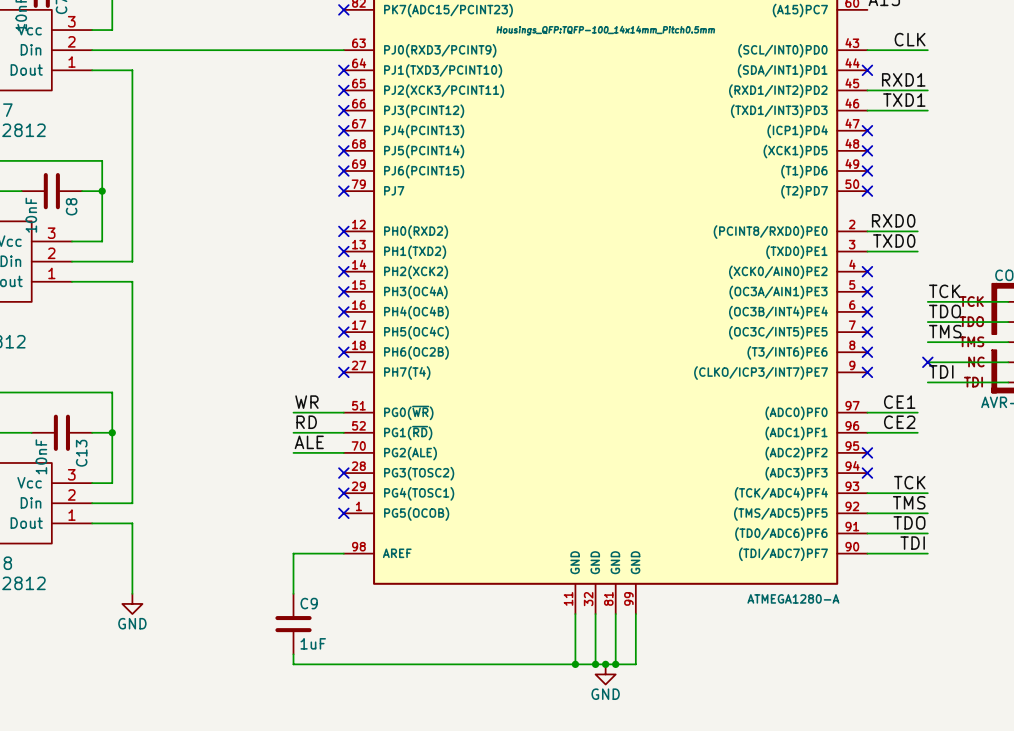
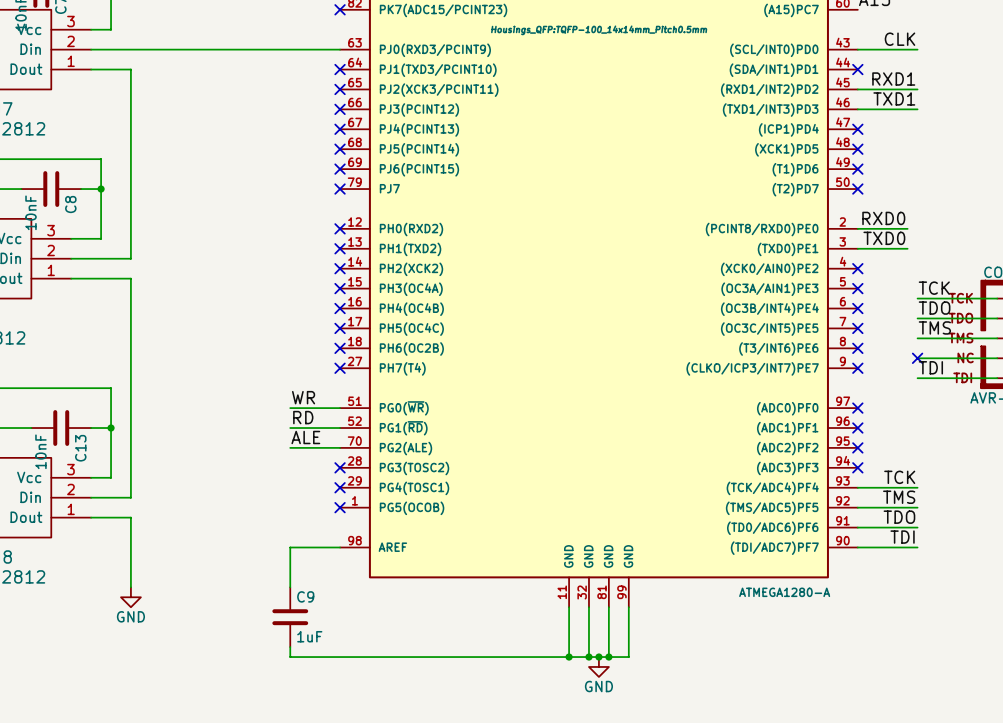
label: CE1 (899, 402) -> none
wire: (867, 412) (917, 412) -> none
no-connect mark: none -> (857, 408)
label: CE2 (899, 422) -> none
wire: (867, 432) (917, 432) -> none
no-connect mark: none -> (857, 428)

